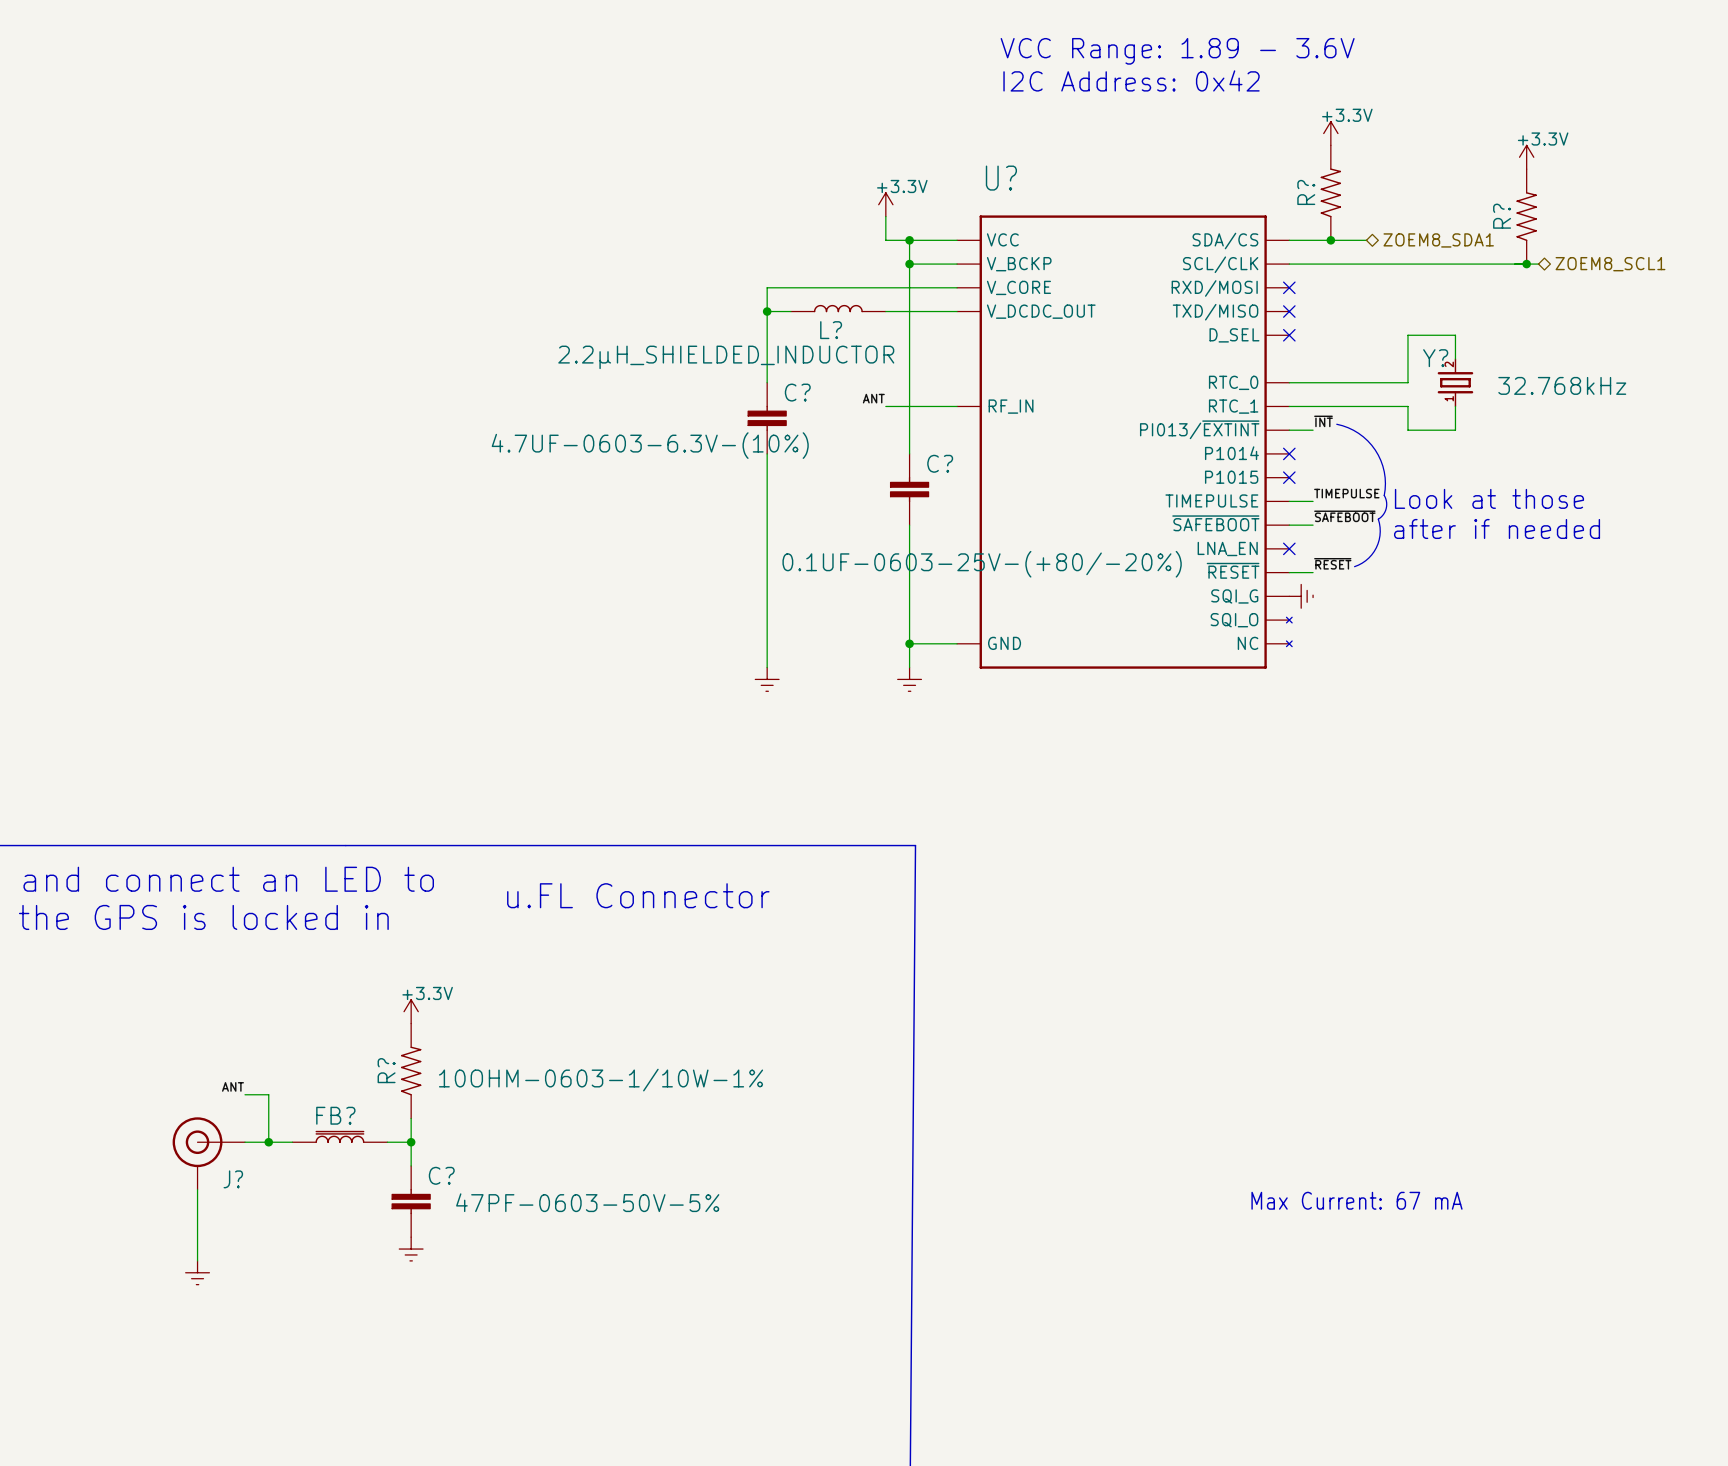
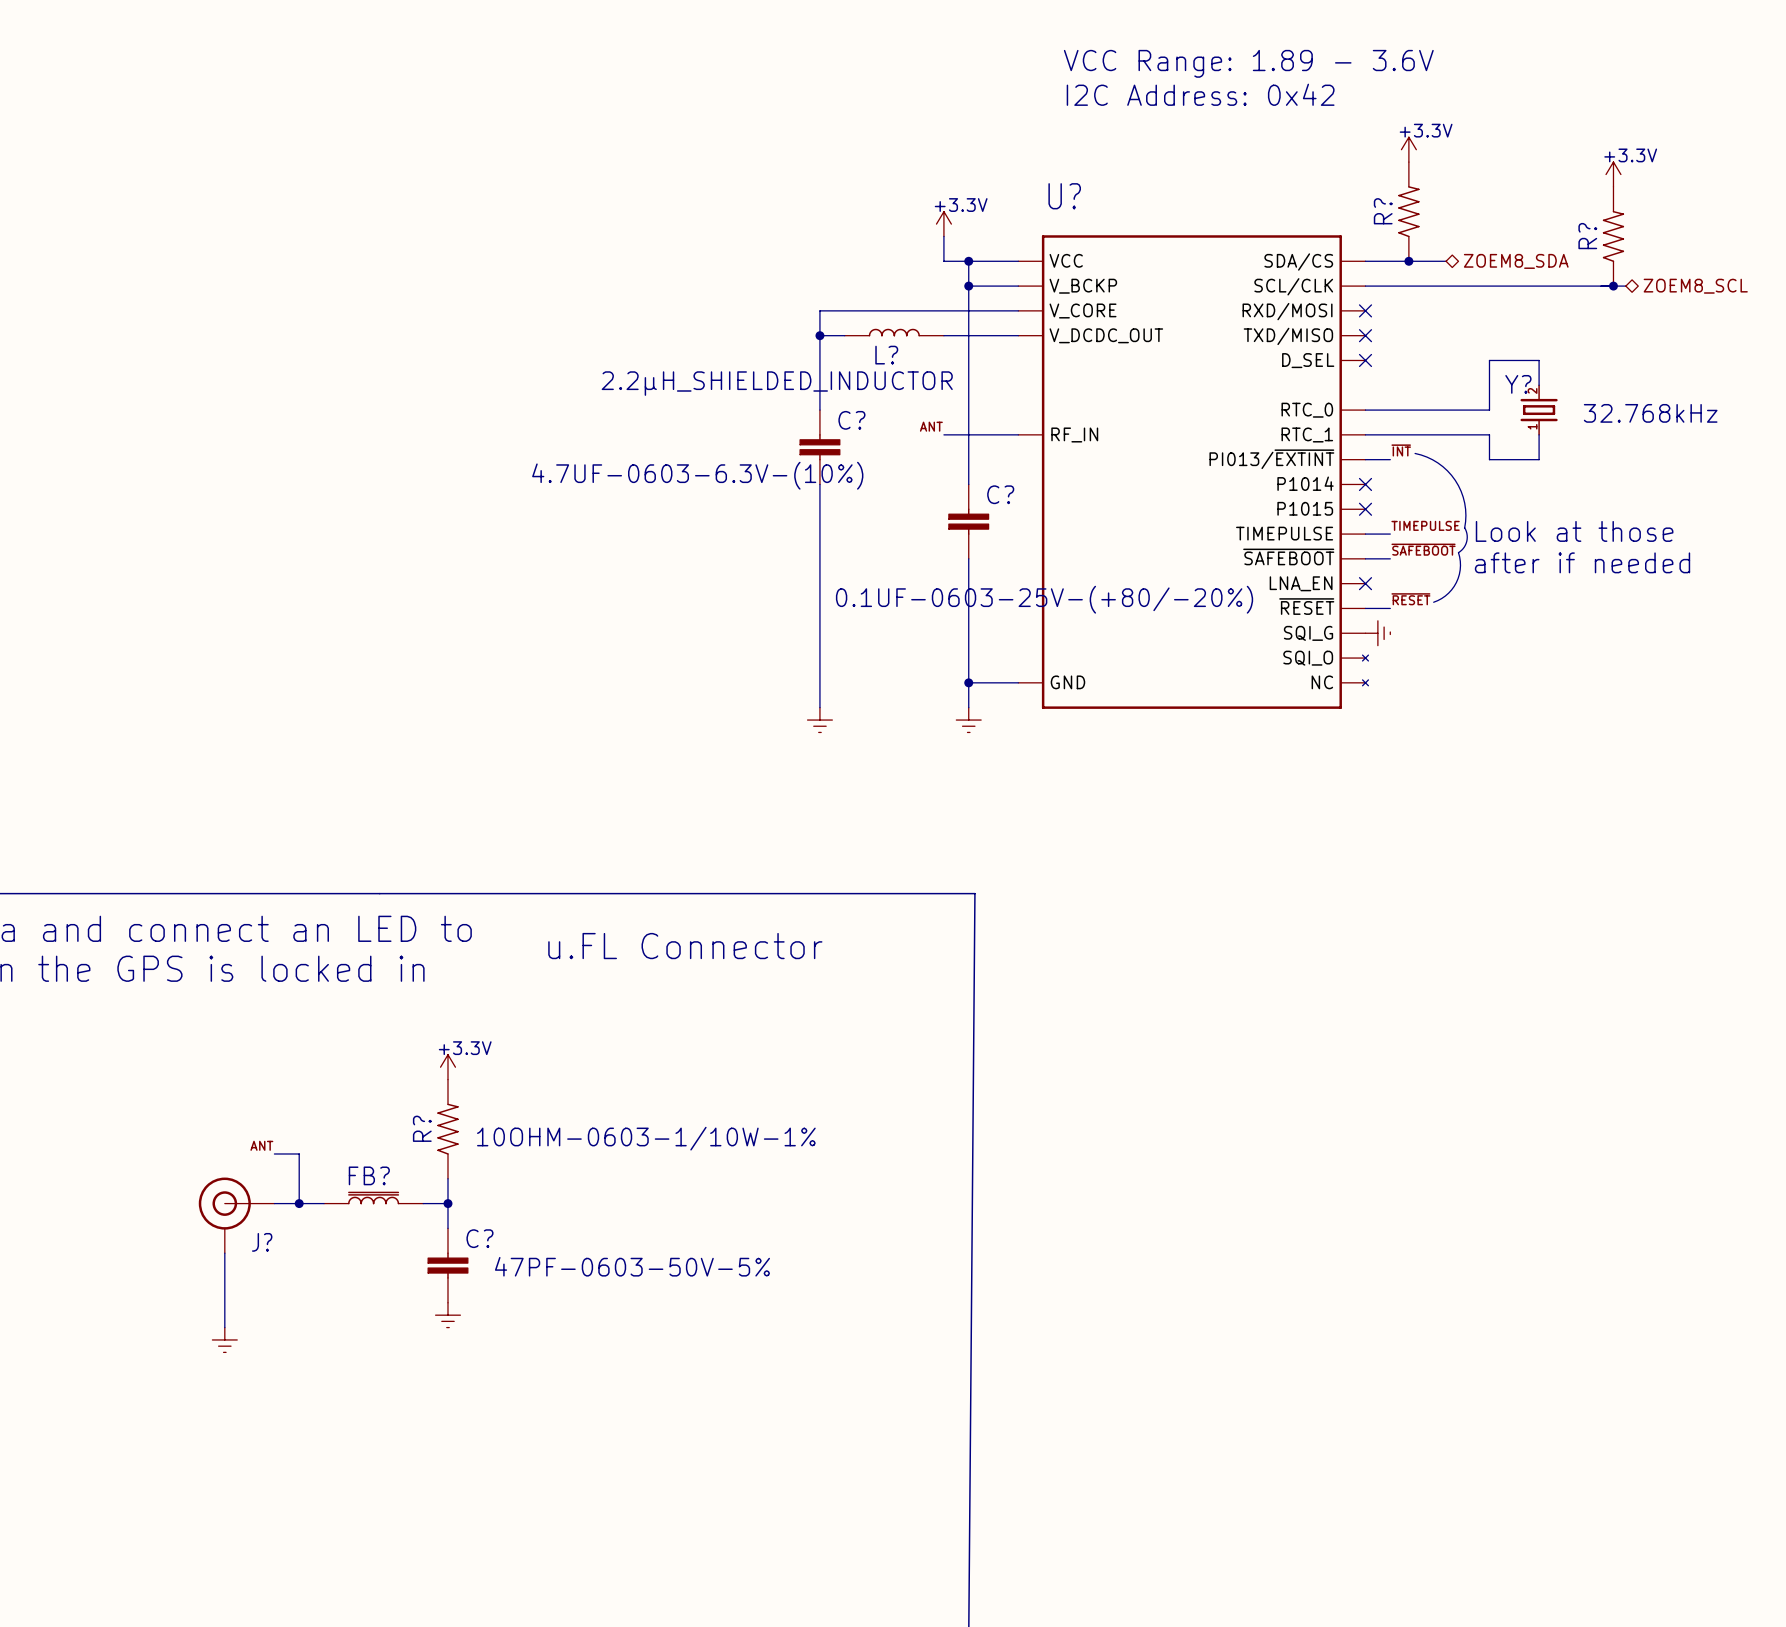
hierarchical label: ZOEM8_SDA1 (1438, 240) -> ZOEM8_SDA (1516, 261)
hierarchical label: ZOEM8_SCL1 (1610, 264) -> ZOEM8_SCL (1695, 286)
text: Max Current: 67 mA (1356, 1200) -> none

